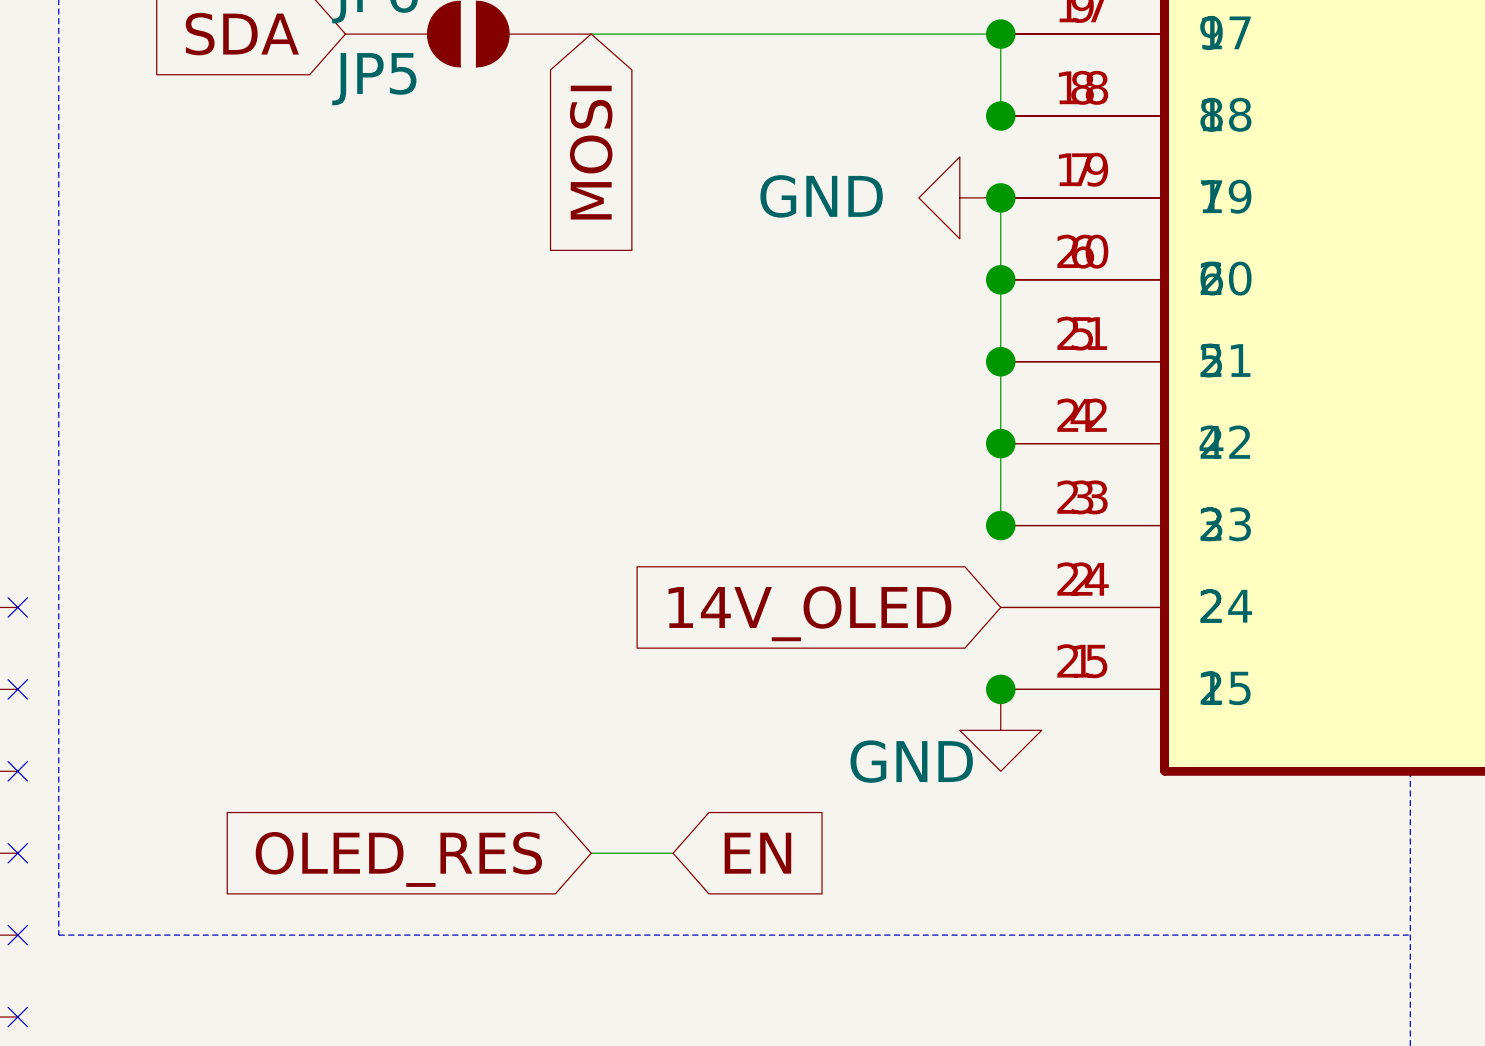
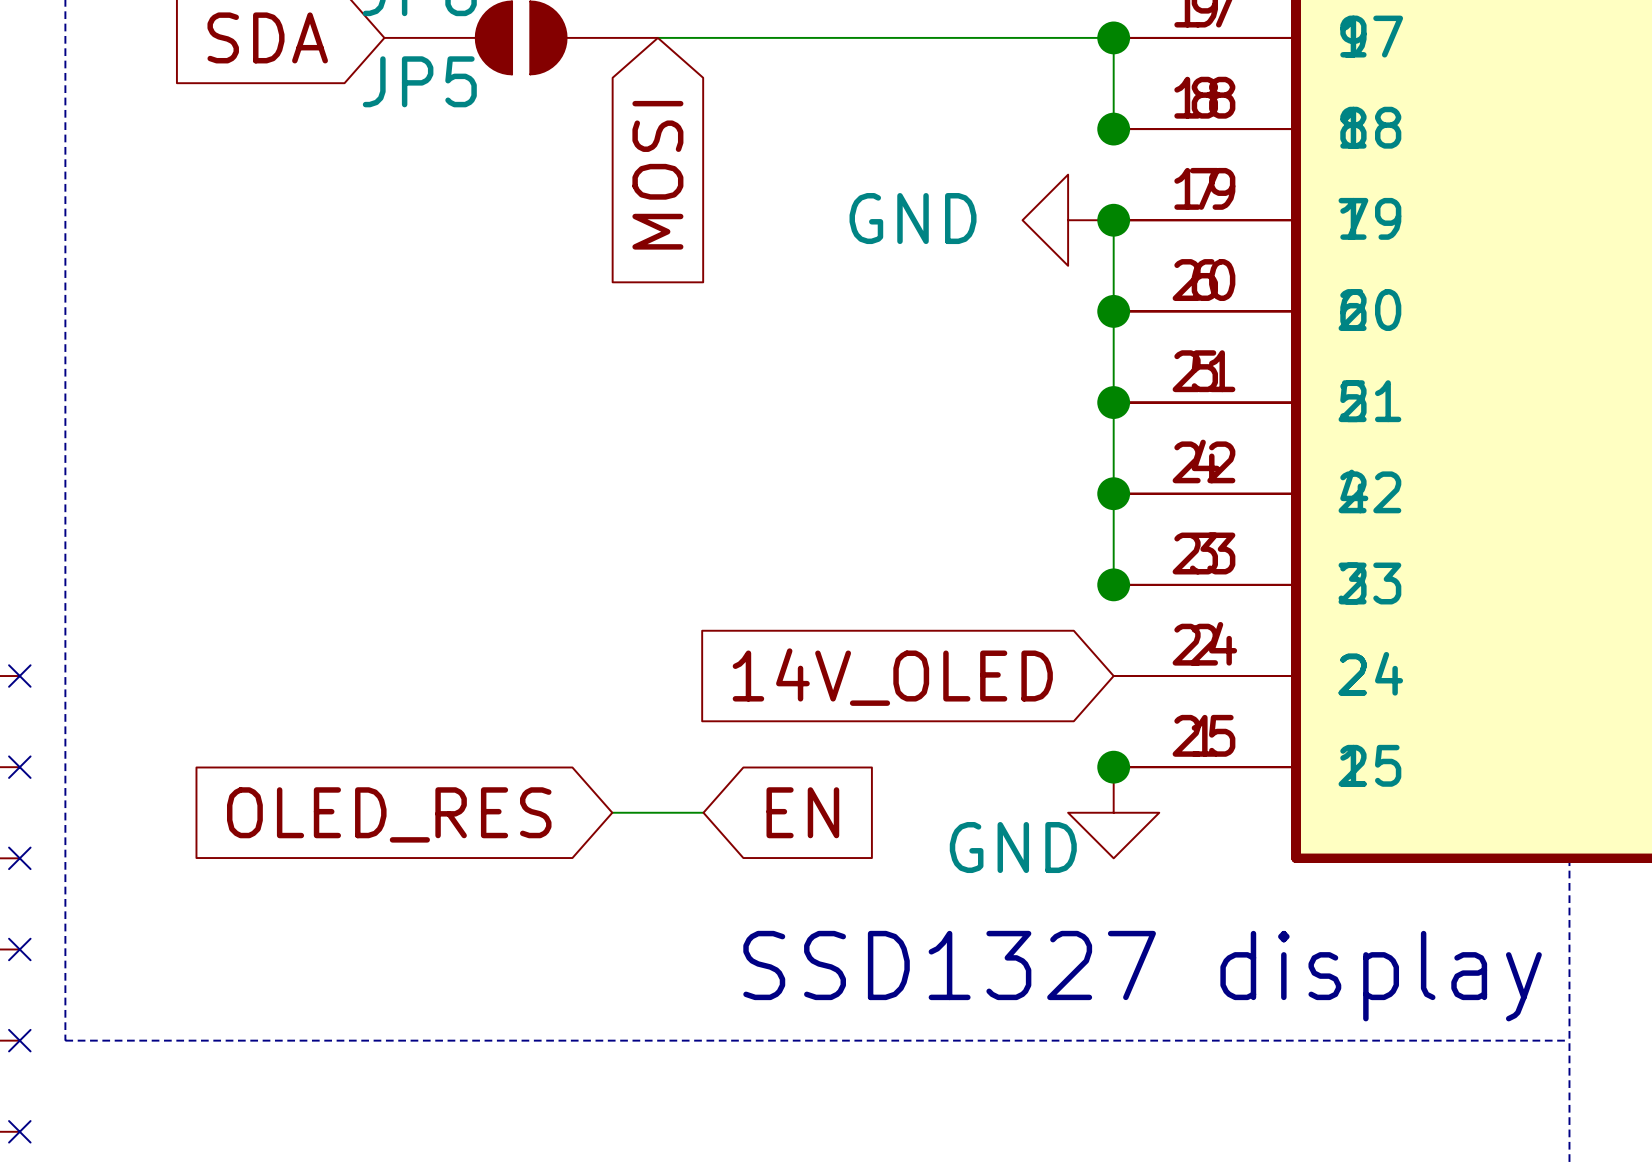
wire: (591, 853) (673, 853) -> (612, 812) (703, 812)
global label position: EN (757, 853) -> EN (802, 812)
global label position: OLED_RES (398, 859) -> OLED_RES (389, 814)
text: none -> SSD1327 display (1142, 976)

